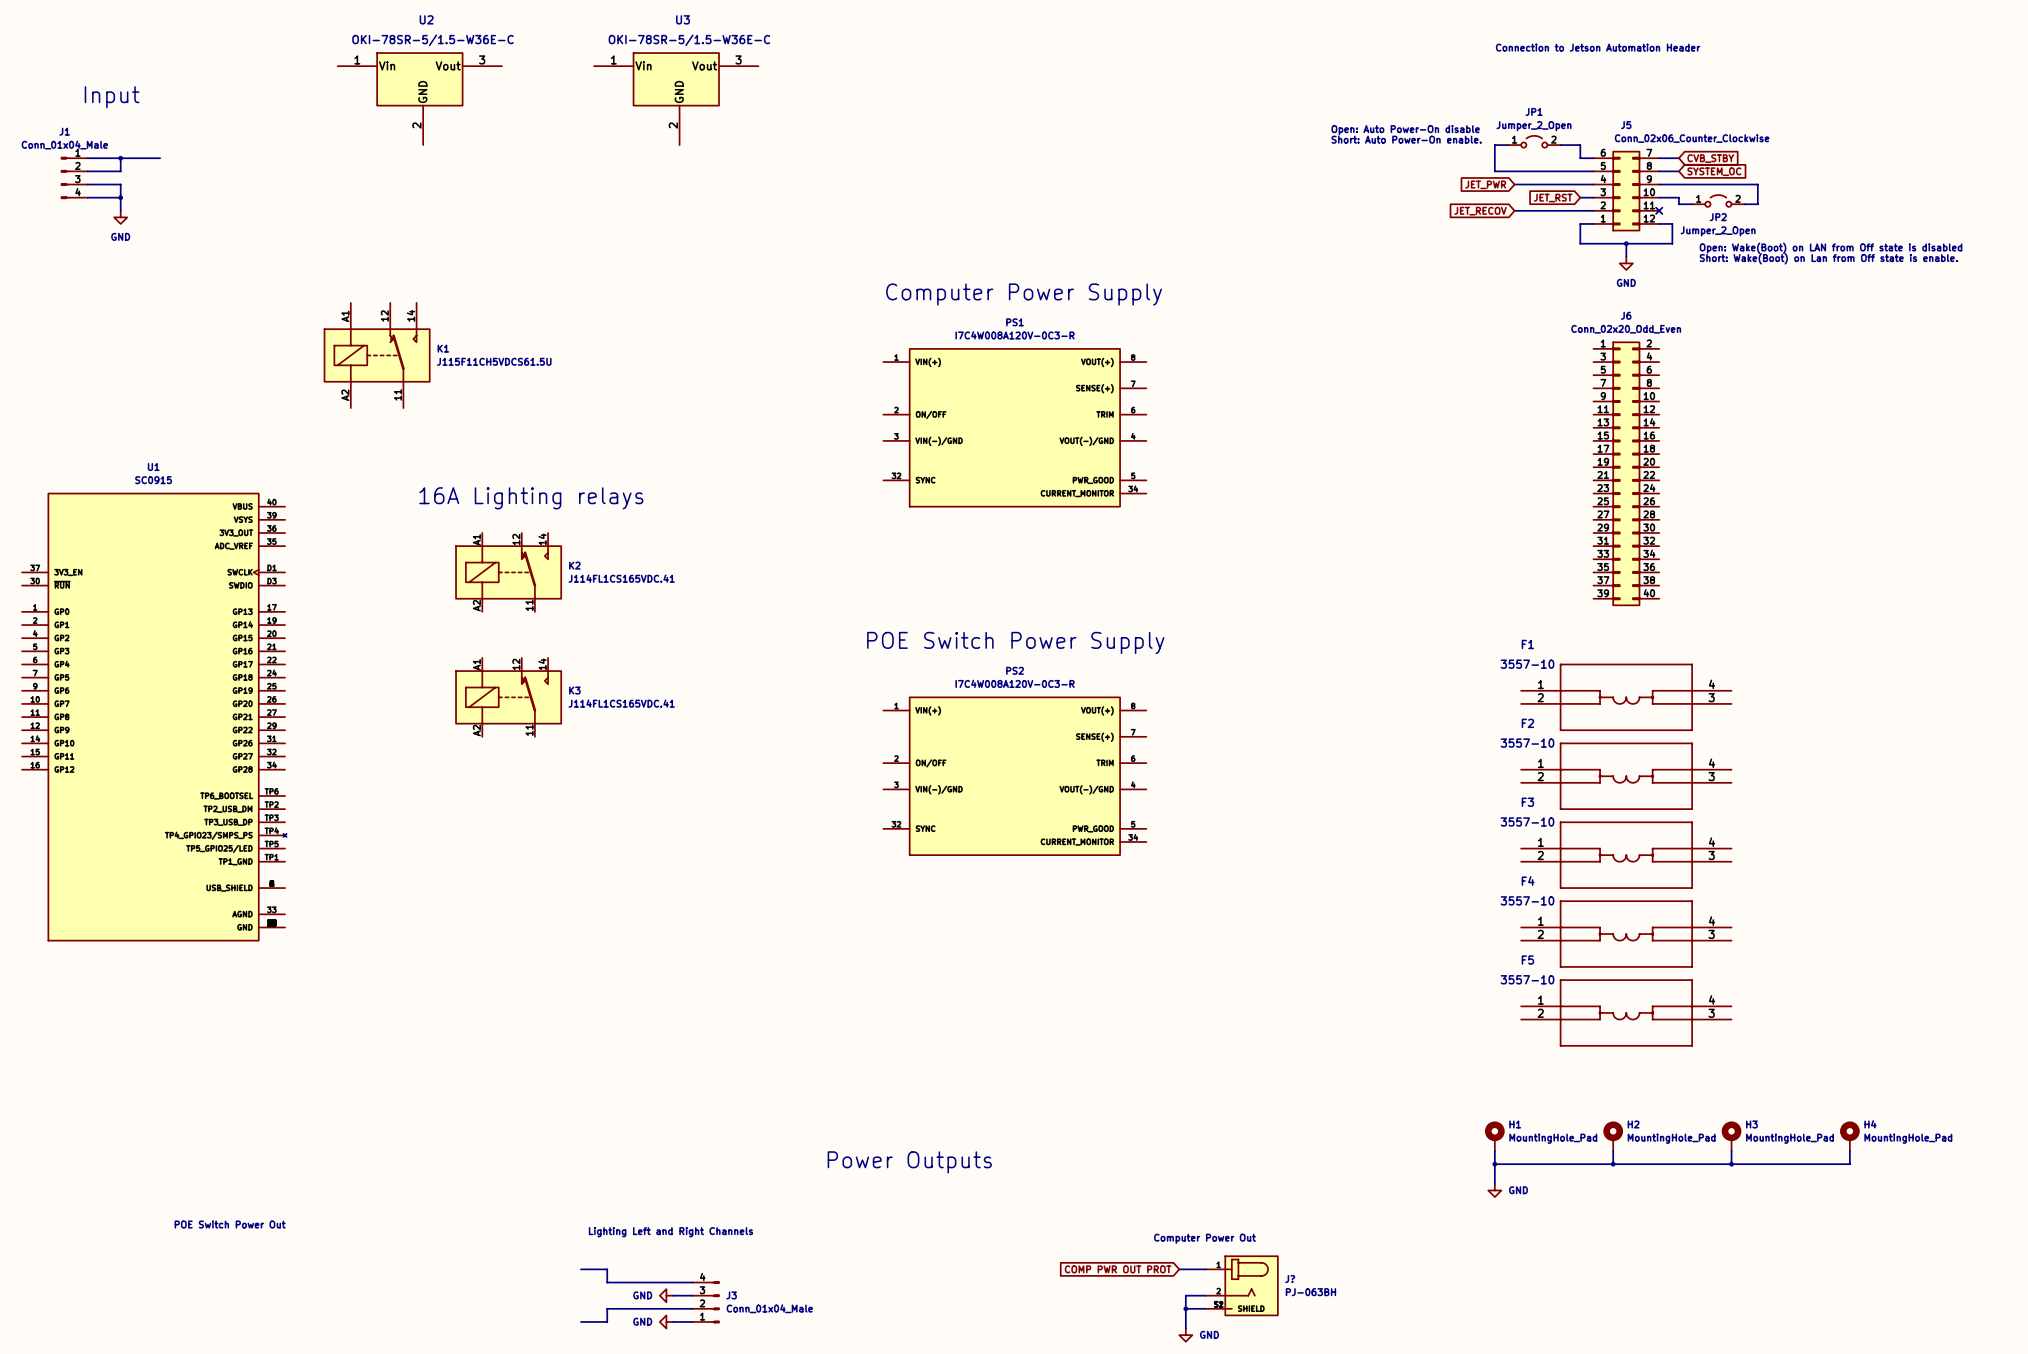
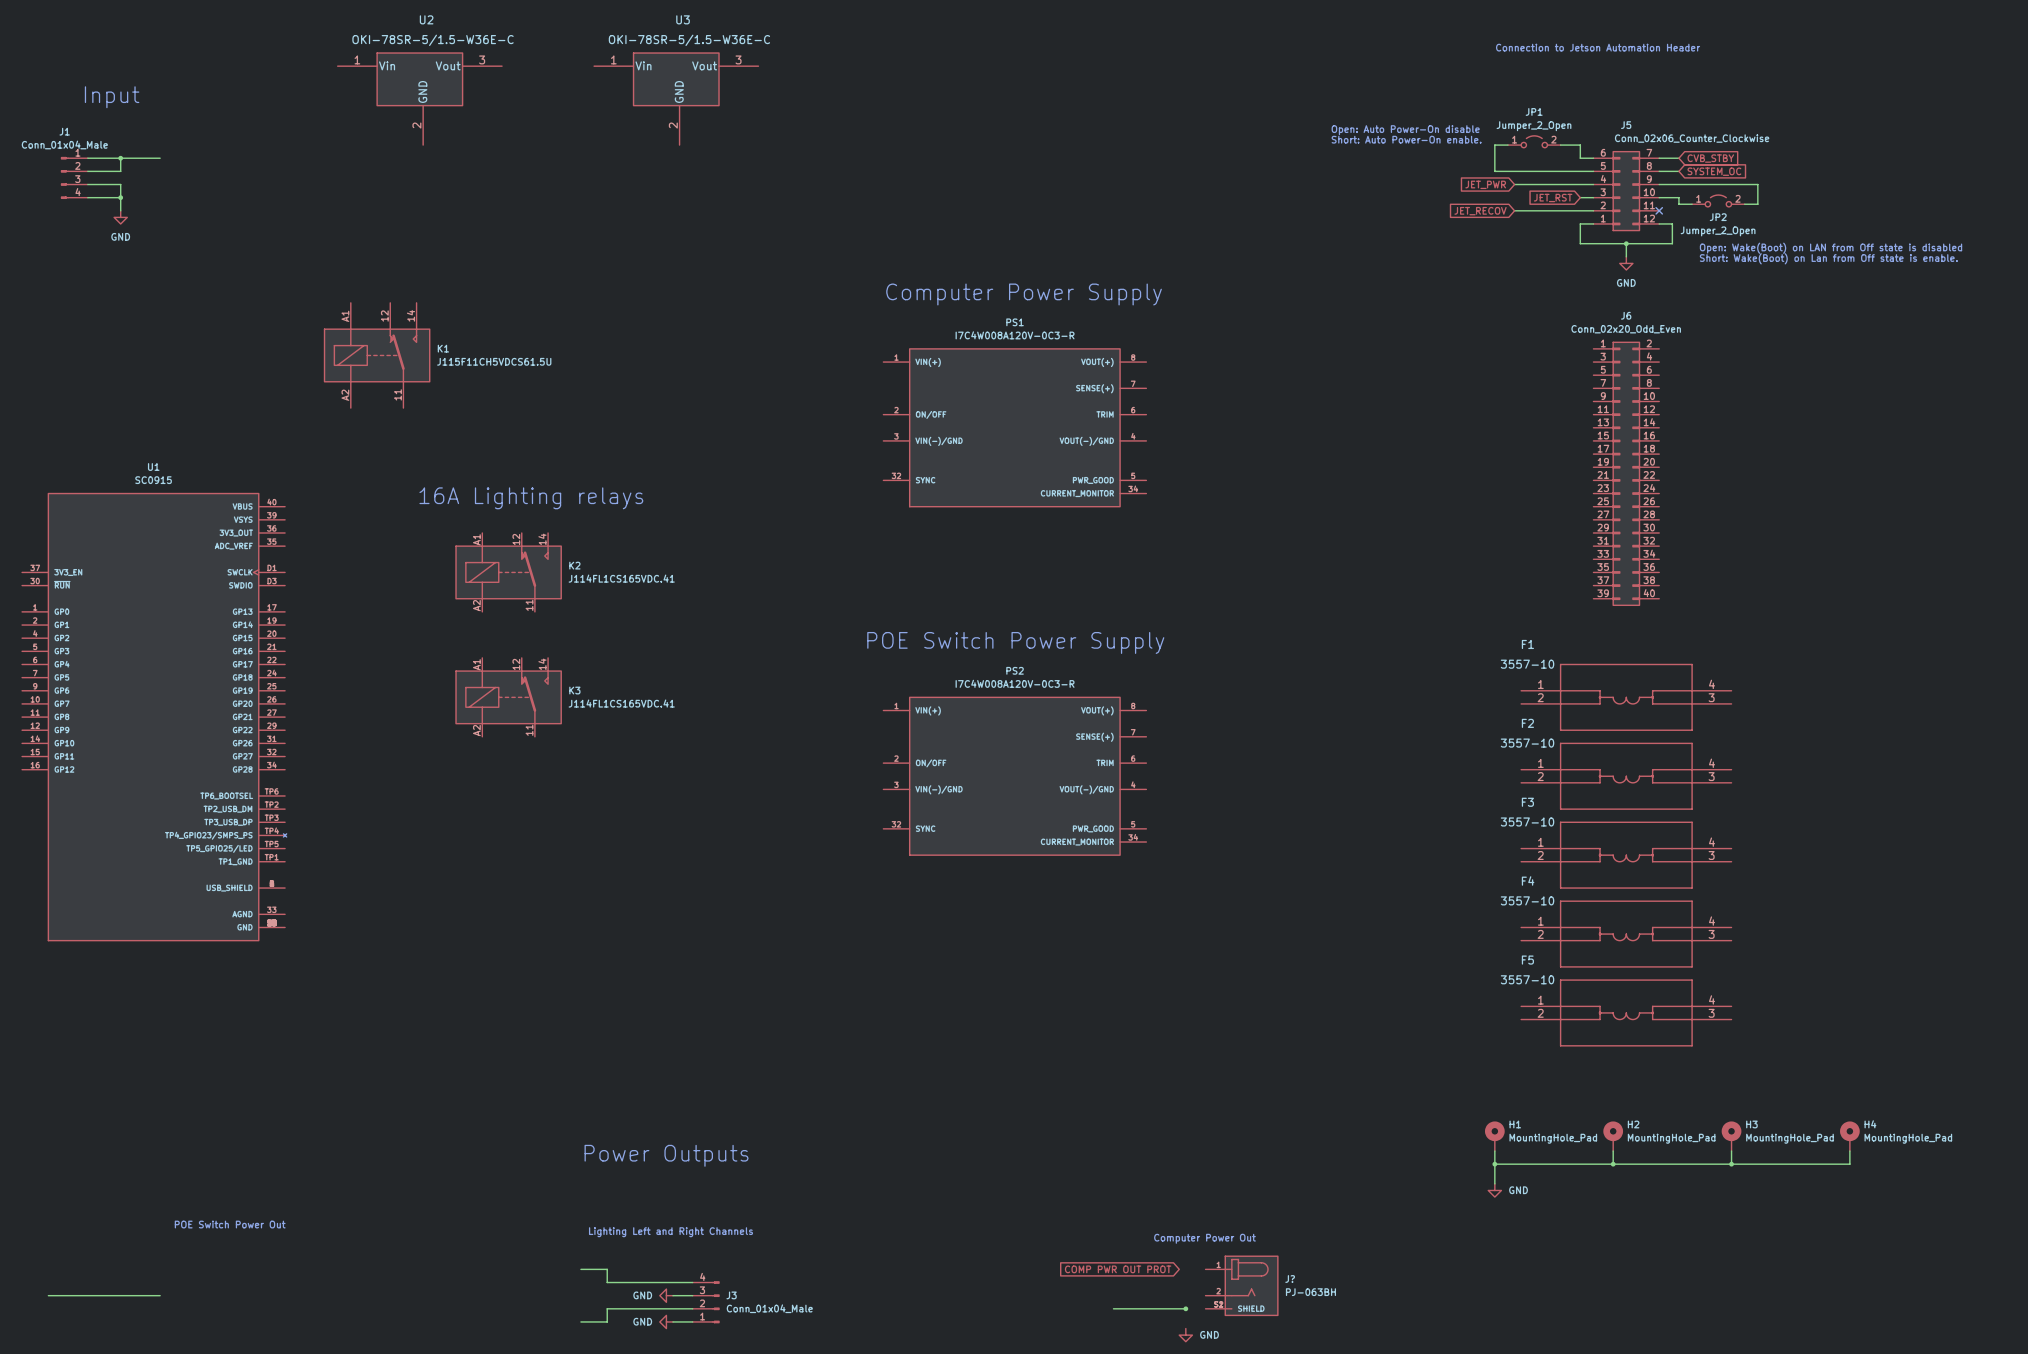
text: none -> Power Outputs (666, 1155)
text: Power Outputs (909, 1162) -> none
wire: (1179, 1269) (1205, 1269) -> none
wire: none -> (48, 1295) (160, 1295)
wire: (1205, 1295) (1185, 1295) (1185, 1328) -> none
wire: (1185, 1308) (1205, 1308) -> (1185, 1308) (1113, 1308)

